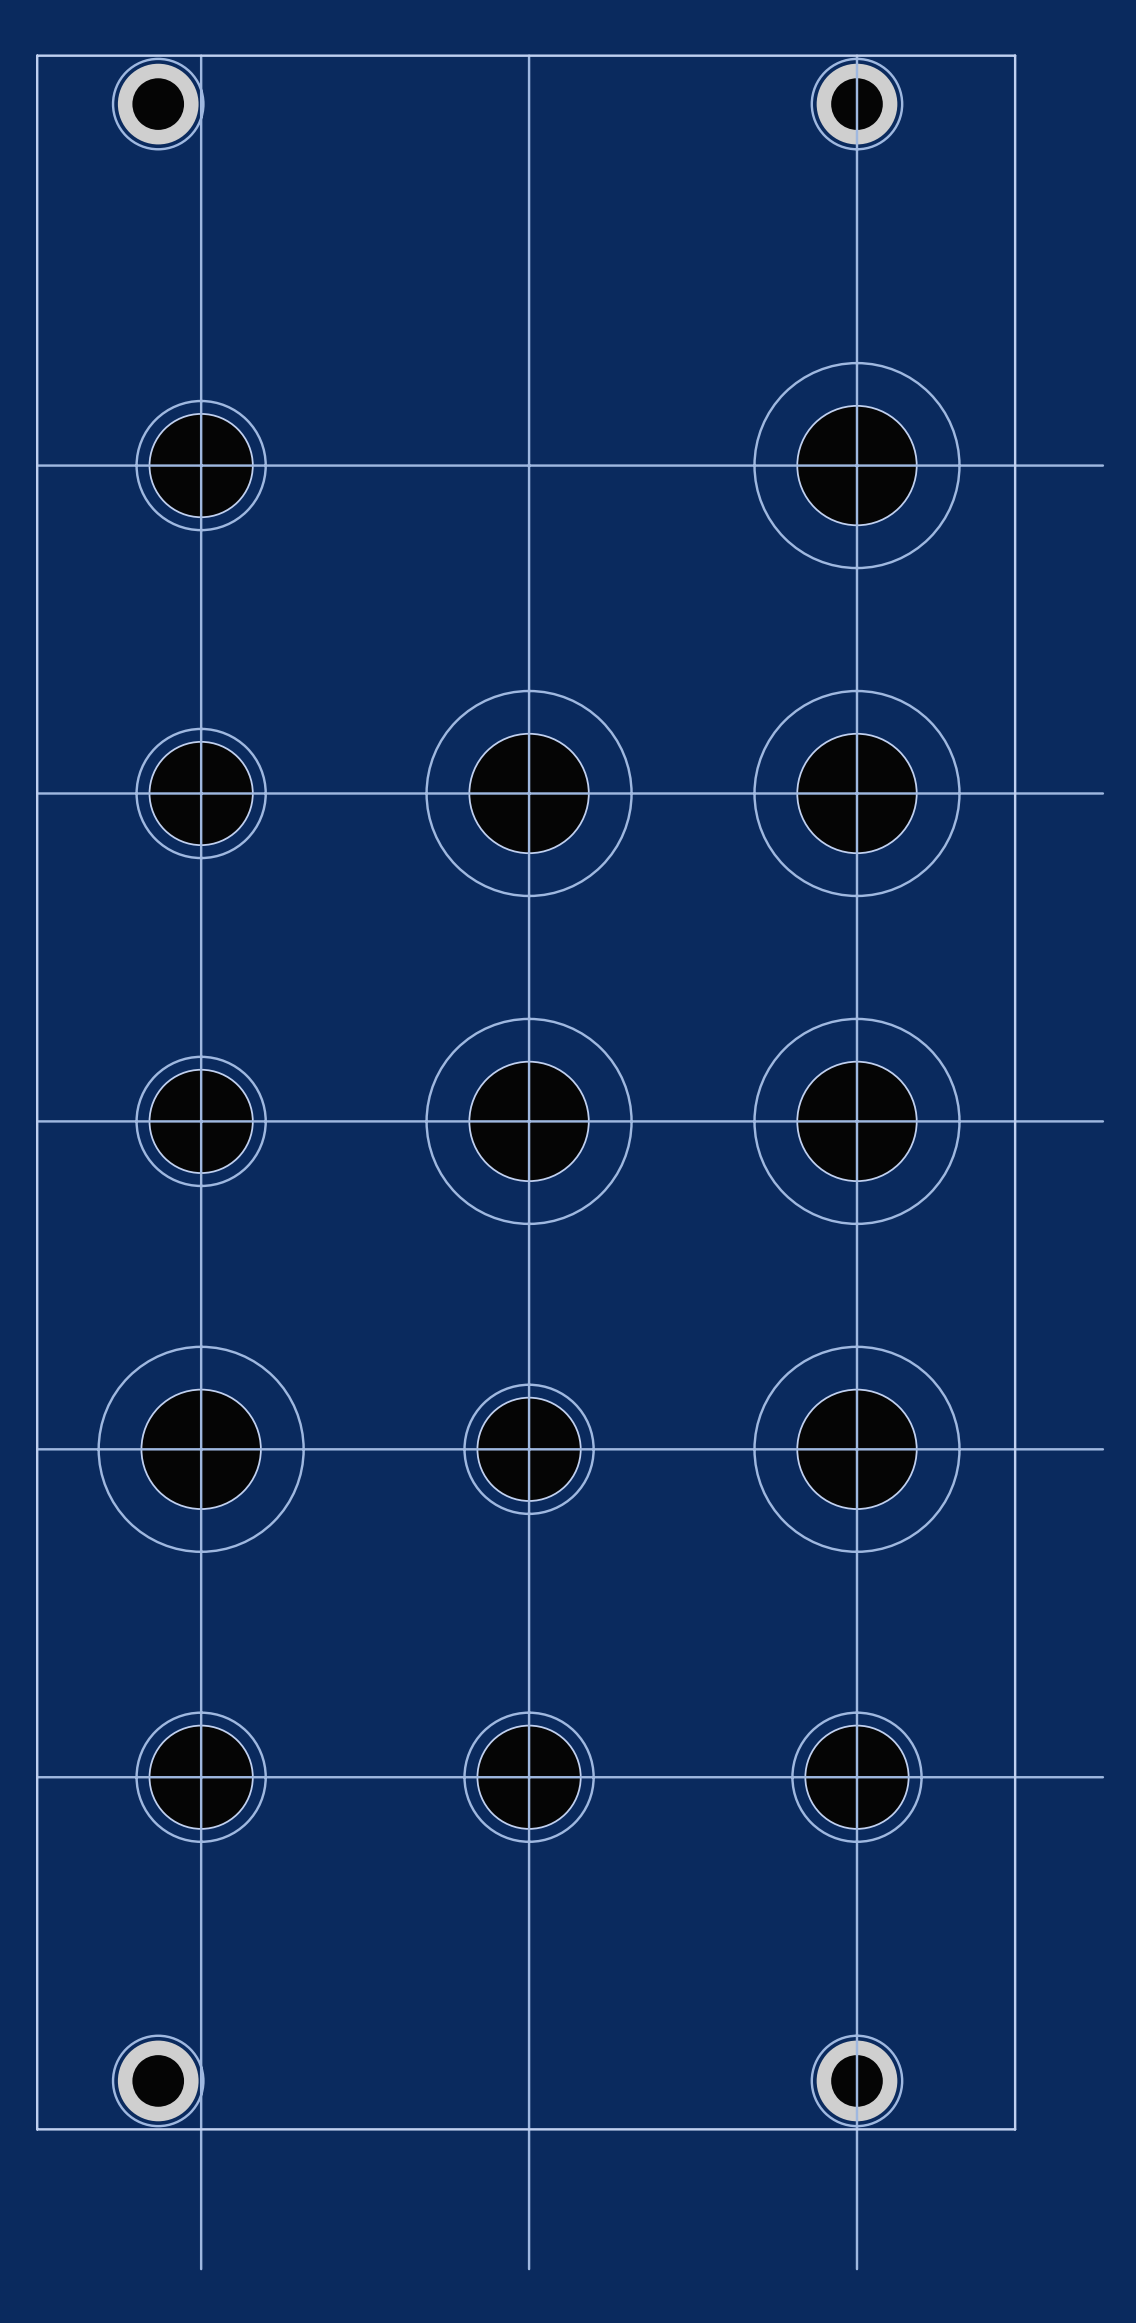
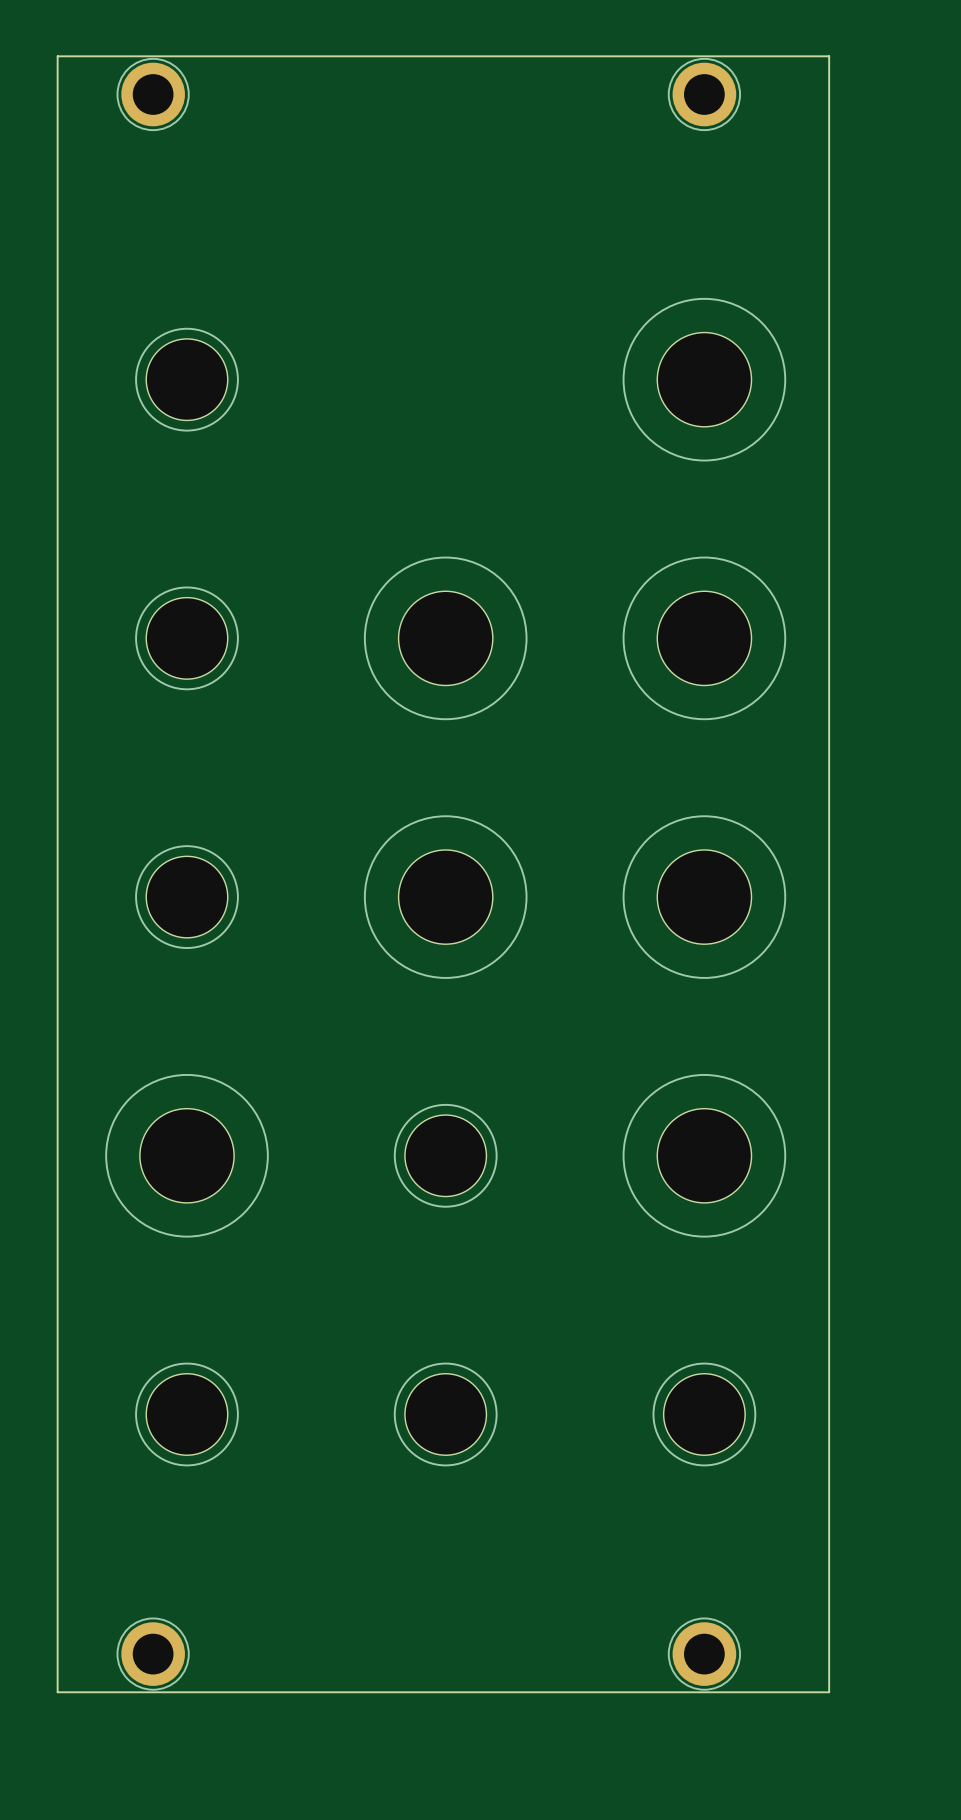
line: (201, 55) (201, 2269) -> none
line: (529, 55) (529, 2269) -> none
line: (856, 55) (856, 2269) -> none
line: (37, 465) (1102, 465) -> none
line: (37, 793) (1102, 793) -> none
line: (37, 1121) (1102, 1121) -> none
line: (37, 1449) (1102, 1449) -> none
line: (37, 1777) (1102, 1777) -> none

